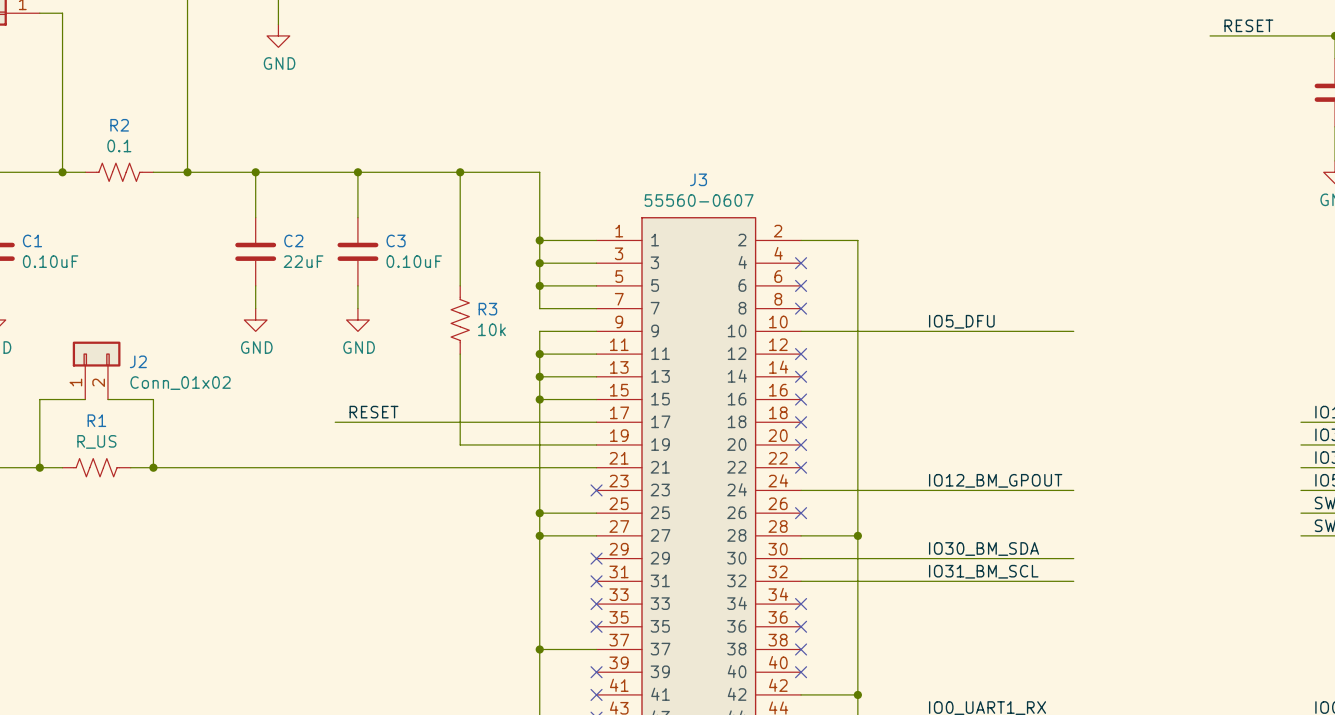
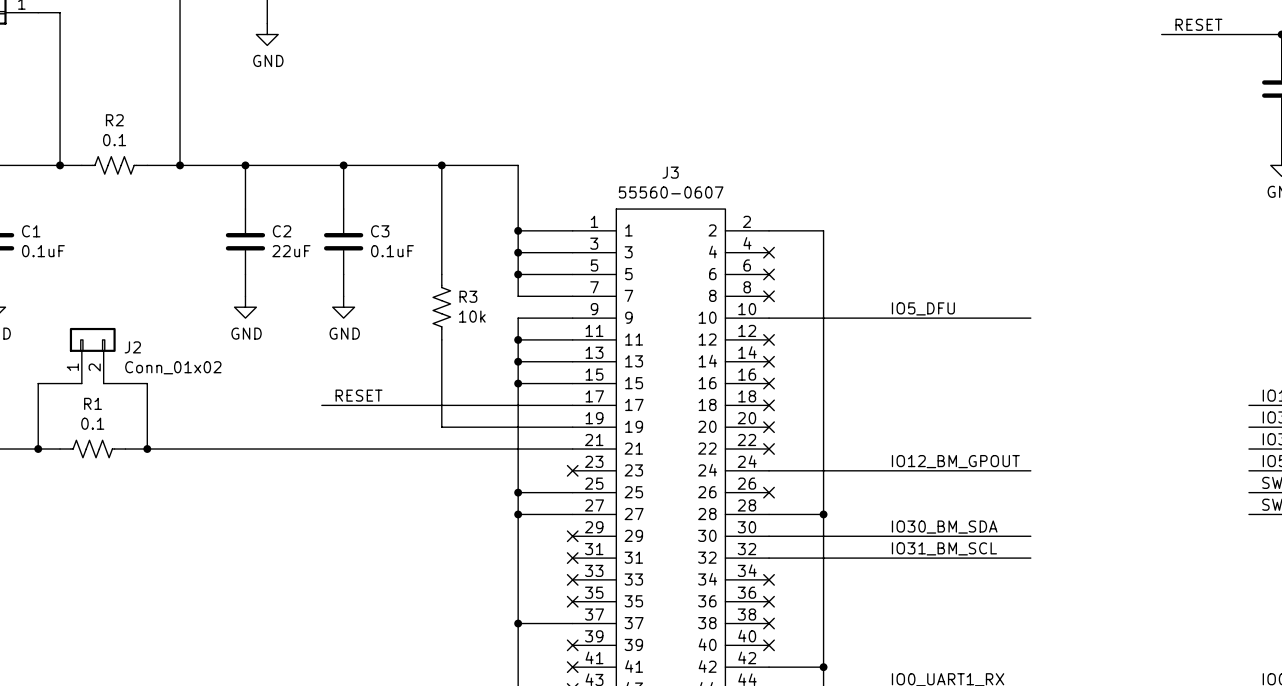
C1 value: 0.10uF (50, 261) -> 0.1uF (43, 251)
C3 value: 0.10uF (414, 261) -> 0.1uF (392, 251)
R1 value: R_US (96, 441) -> 0.1 (92, 423)

